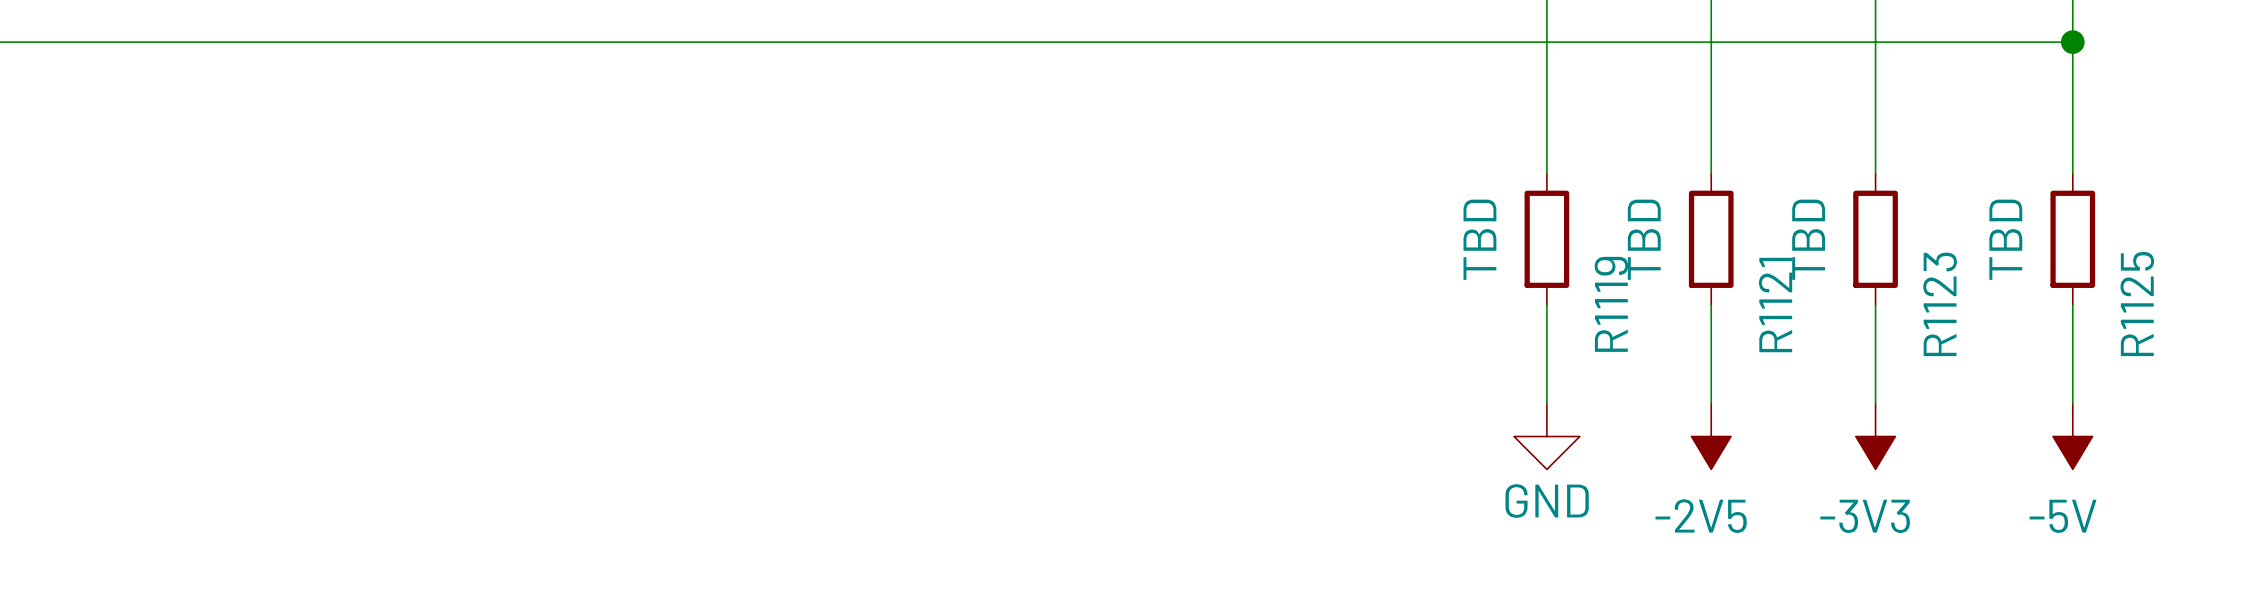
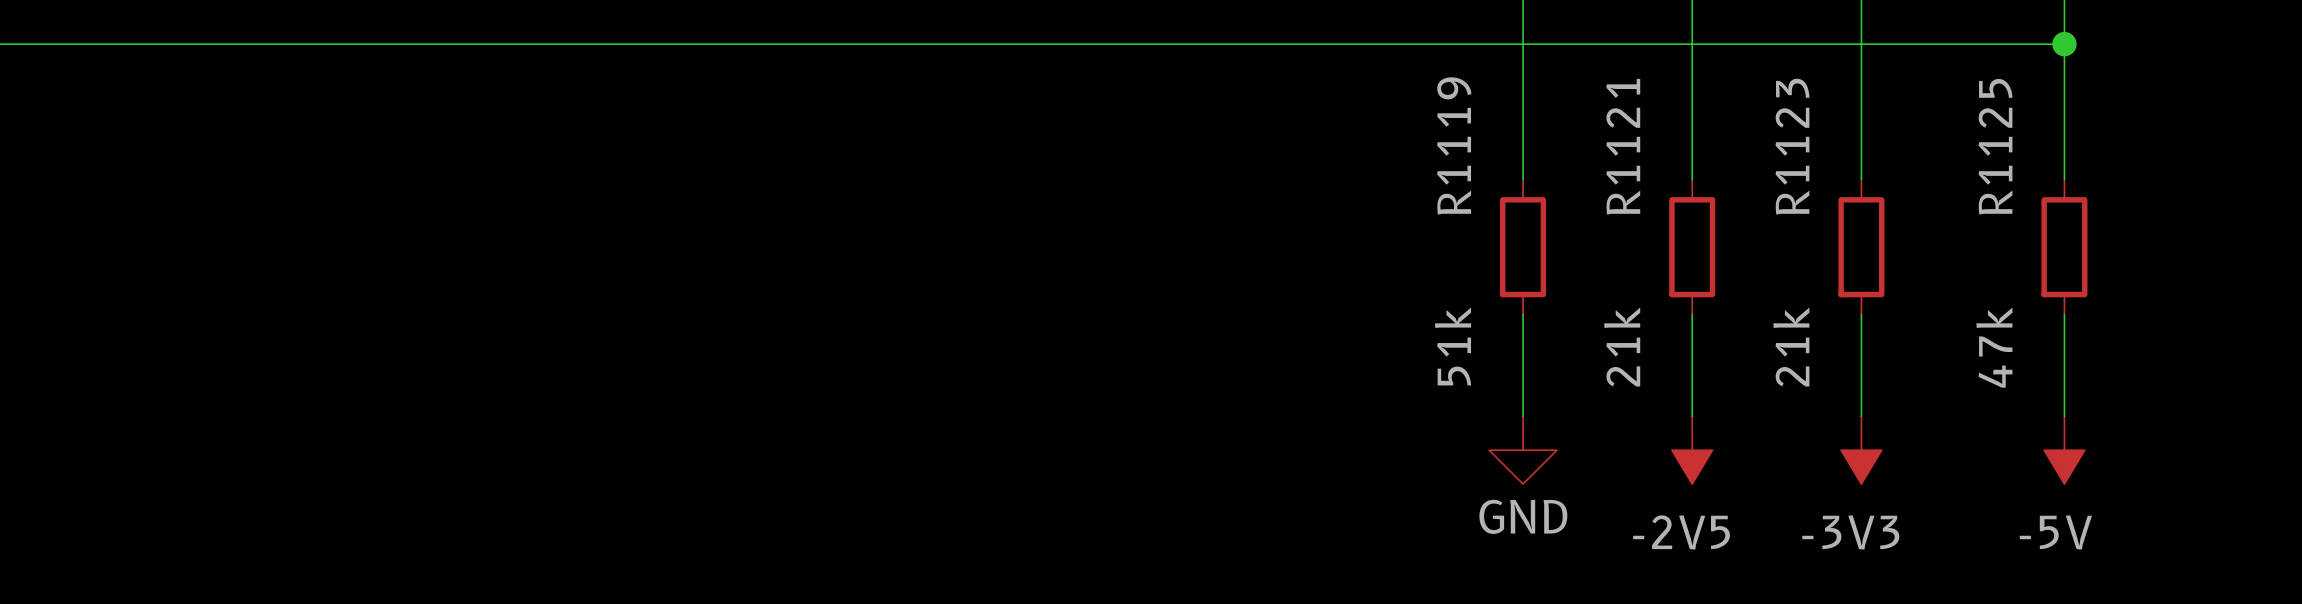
R1119 value: TBD (1479, 239) -> 51k (1452, 346)
R1121 value: TBD (1644, 239) -> 21k (1622, 347)
R1123 value: TBD (1808, 239) -> 21k (1791, 347)
R1125 value: TBD (2005, 239) -> 47k (1994, 347)
R1119 name position: R1119 (1611, 304) -> R1119 (1454, 145)
R1123 name position: R1123 (1940, 304) -> R1123 (1792, 146)
R1125 name position: R1125 (2137, 304) -> R1125 (1995, 146)
R1121 name position: R1121 (1775, 305) -> R1121 (1623, 146)

